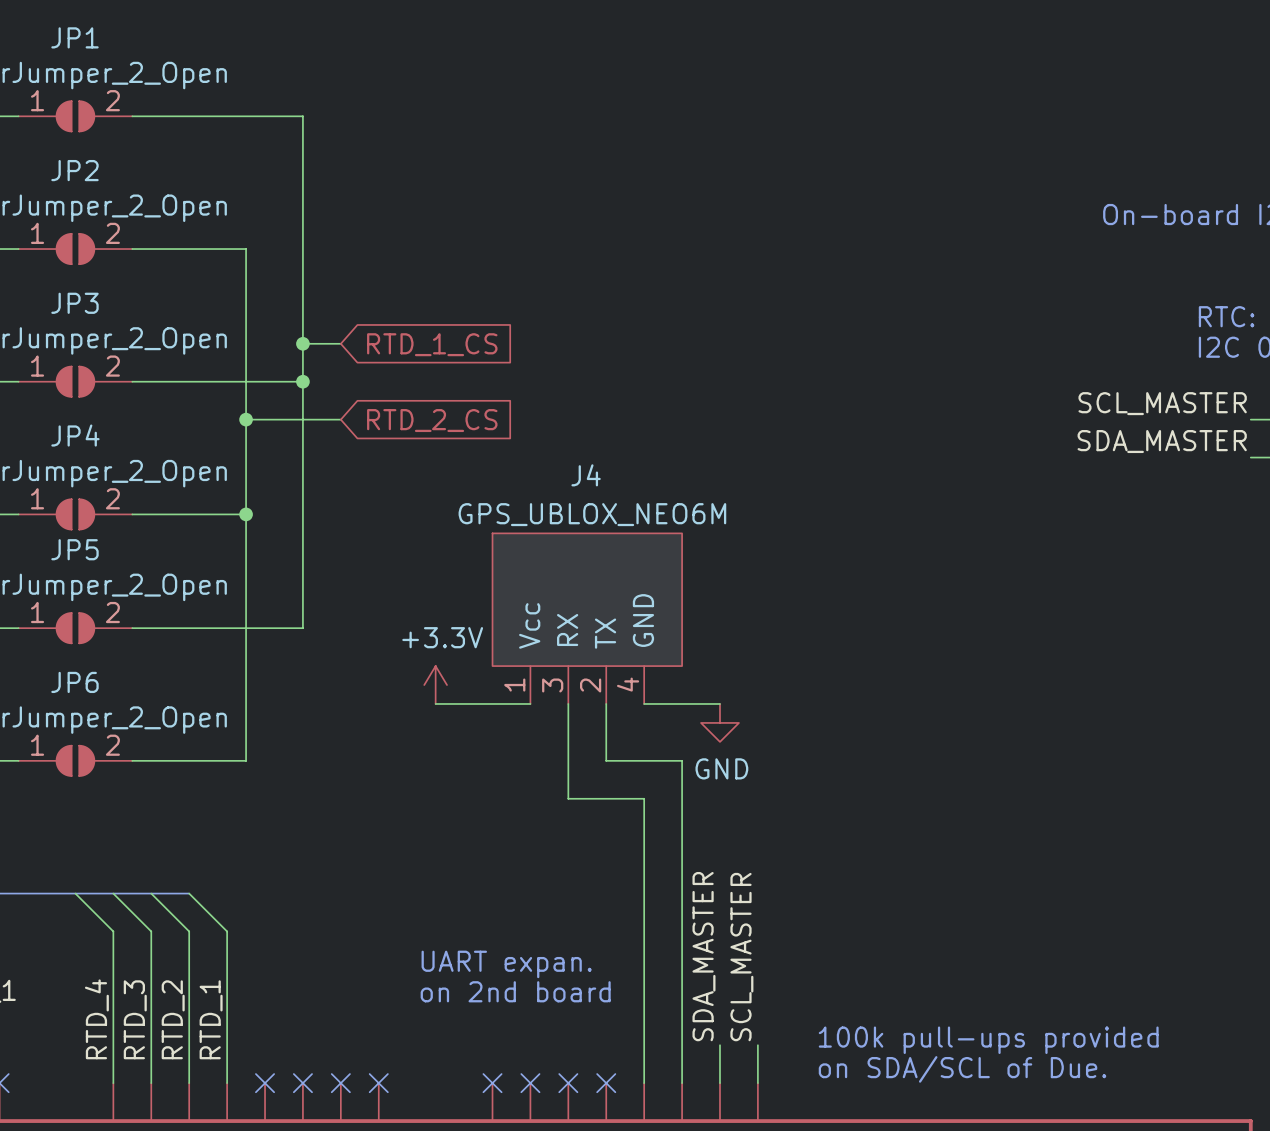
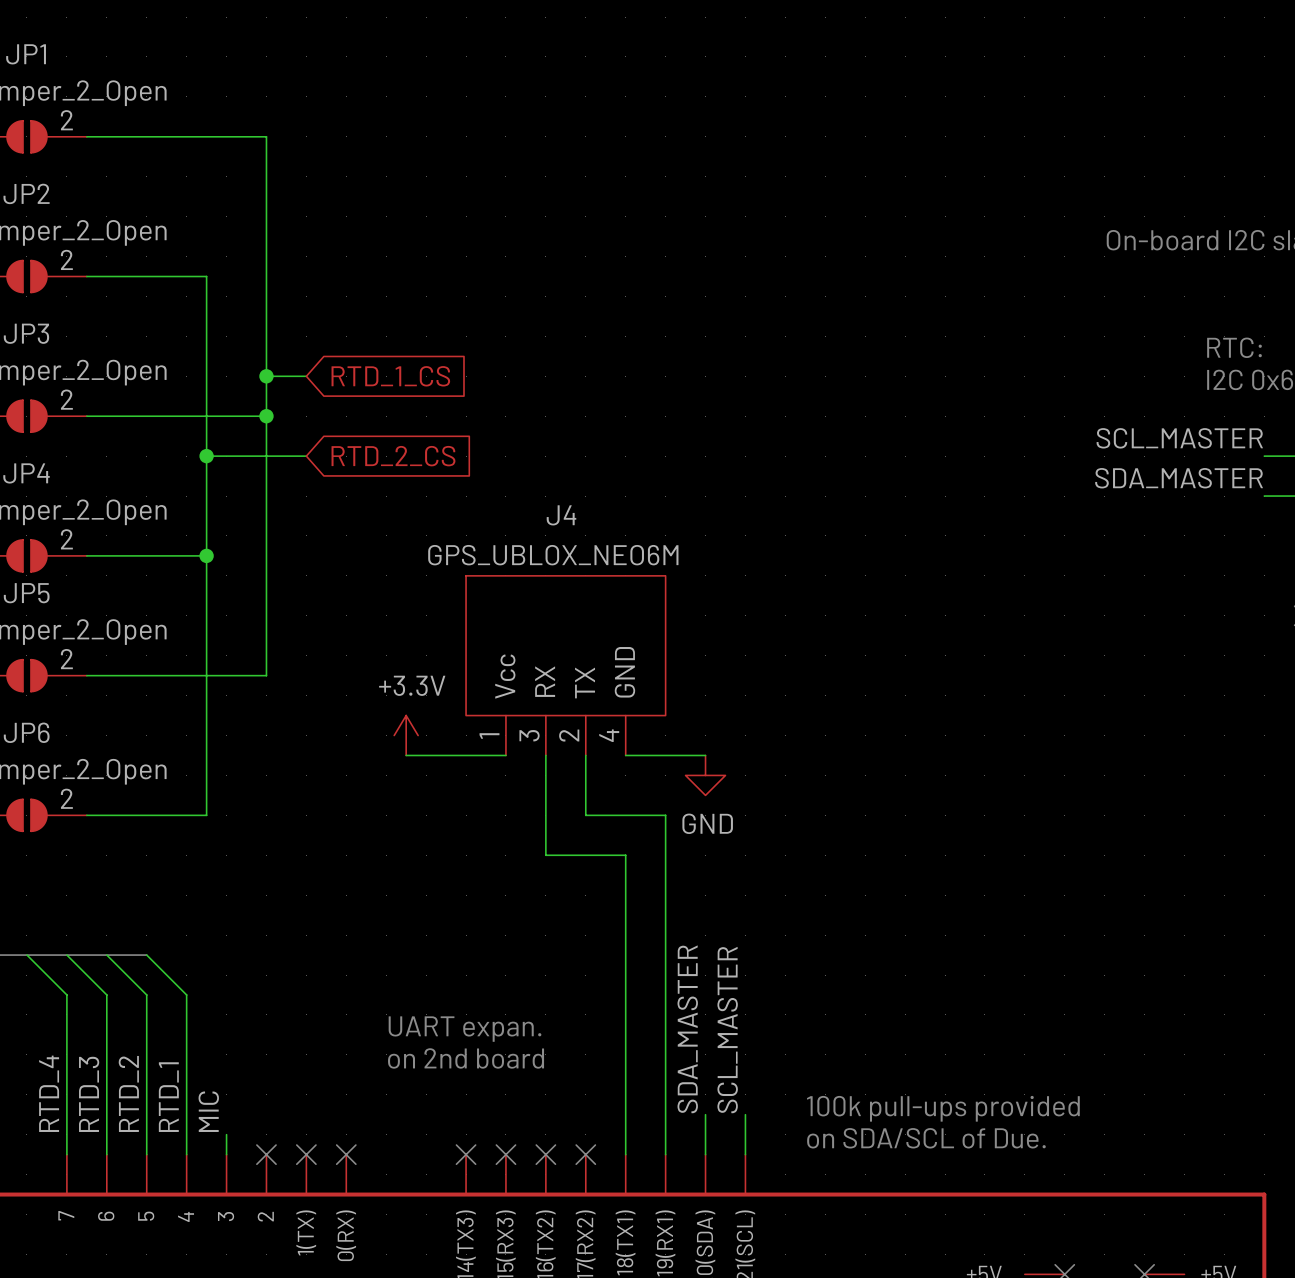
label: none -> MIC (208, 1111)
wire: none -> (226, 1134) (226, 1154)
no-connect mark: (265, 1083) -> none

